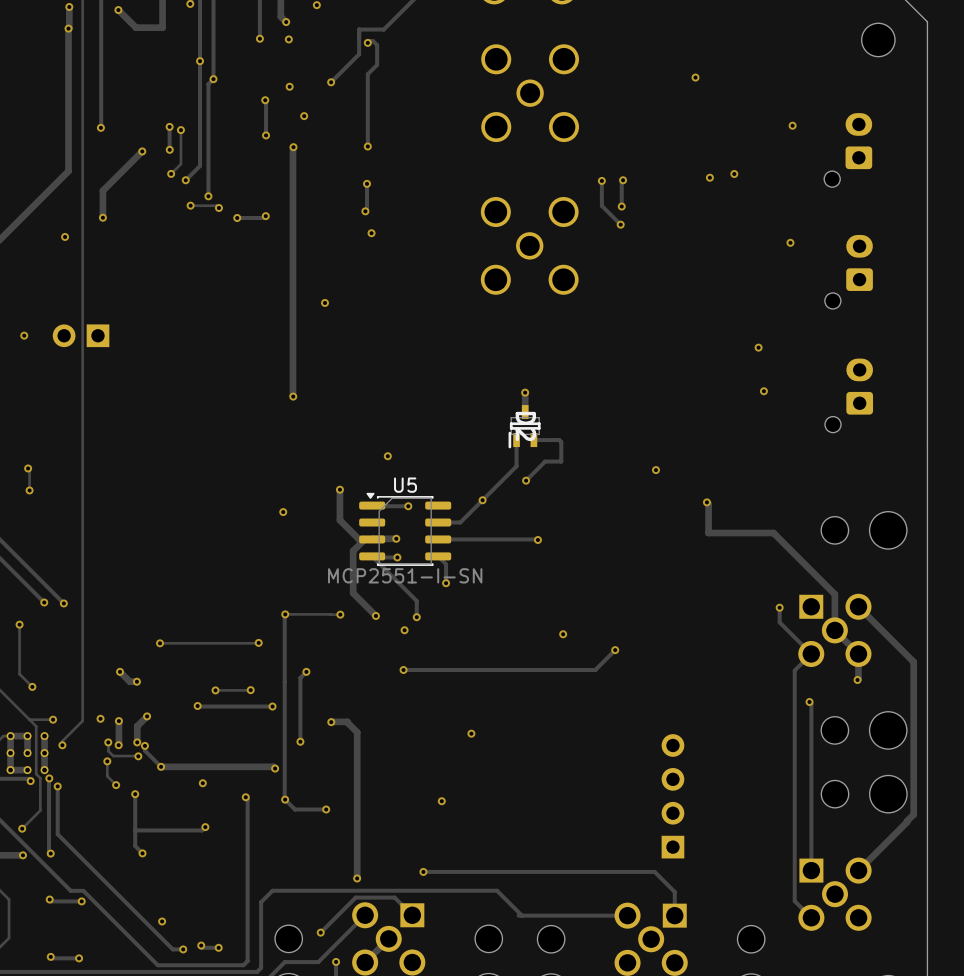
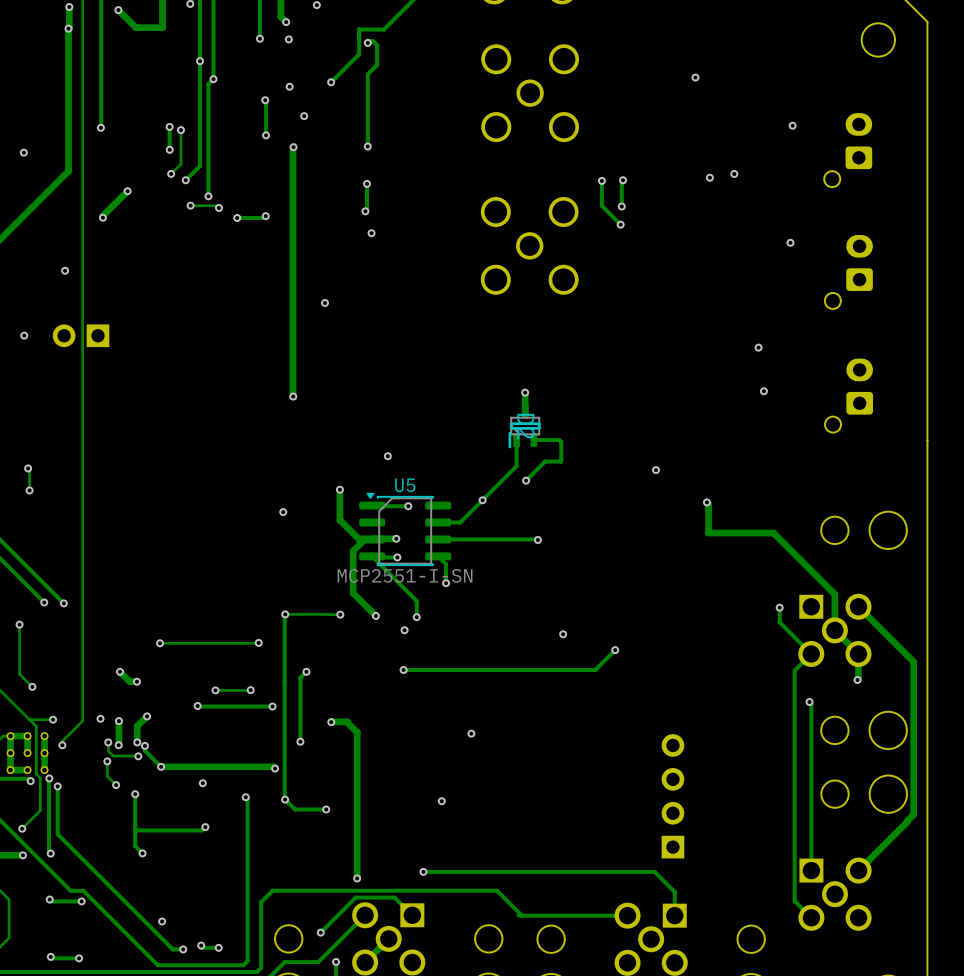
track: (142, 151) (102, 190) (102, 215) -> (127, 191) (102, 215)
via: (142, 151) -> none
via: none -> (23, 152)
via: none -> (127, 191)
via position: (65, 236) -> (65, 270)

